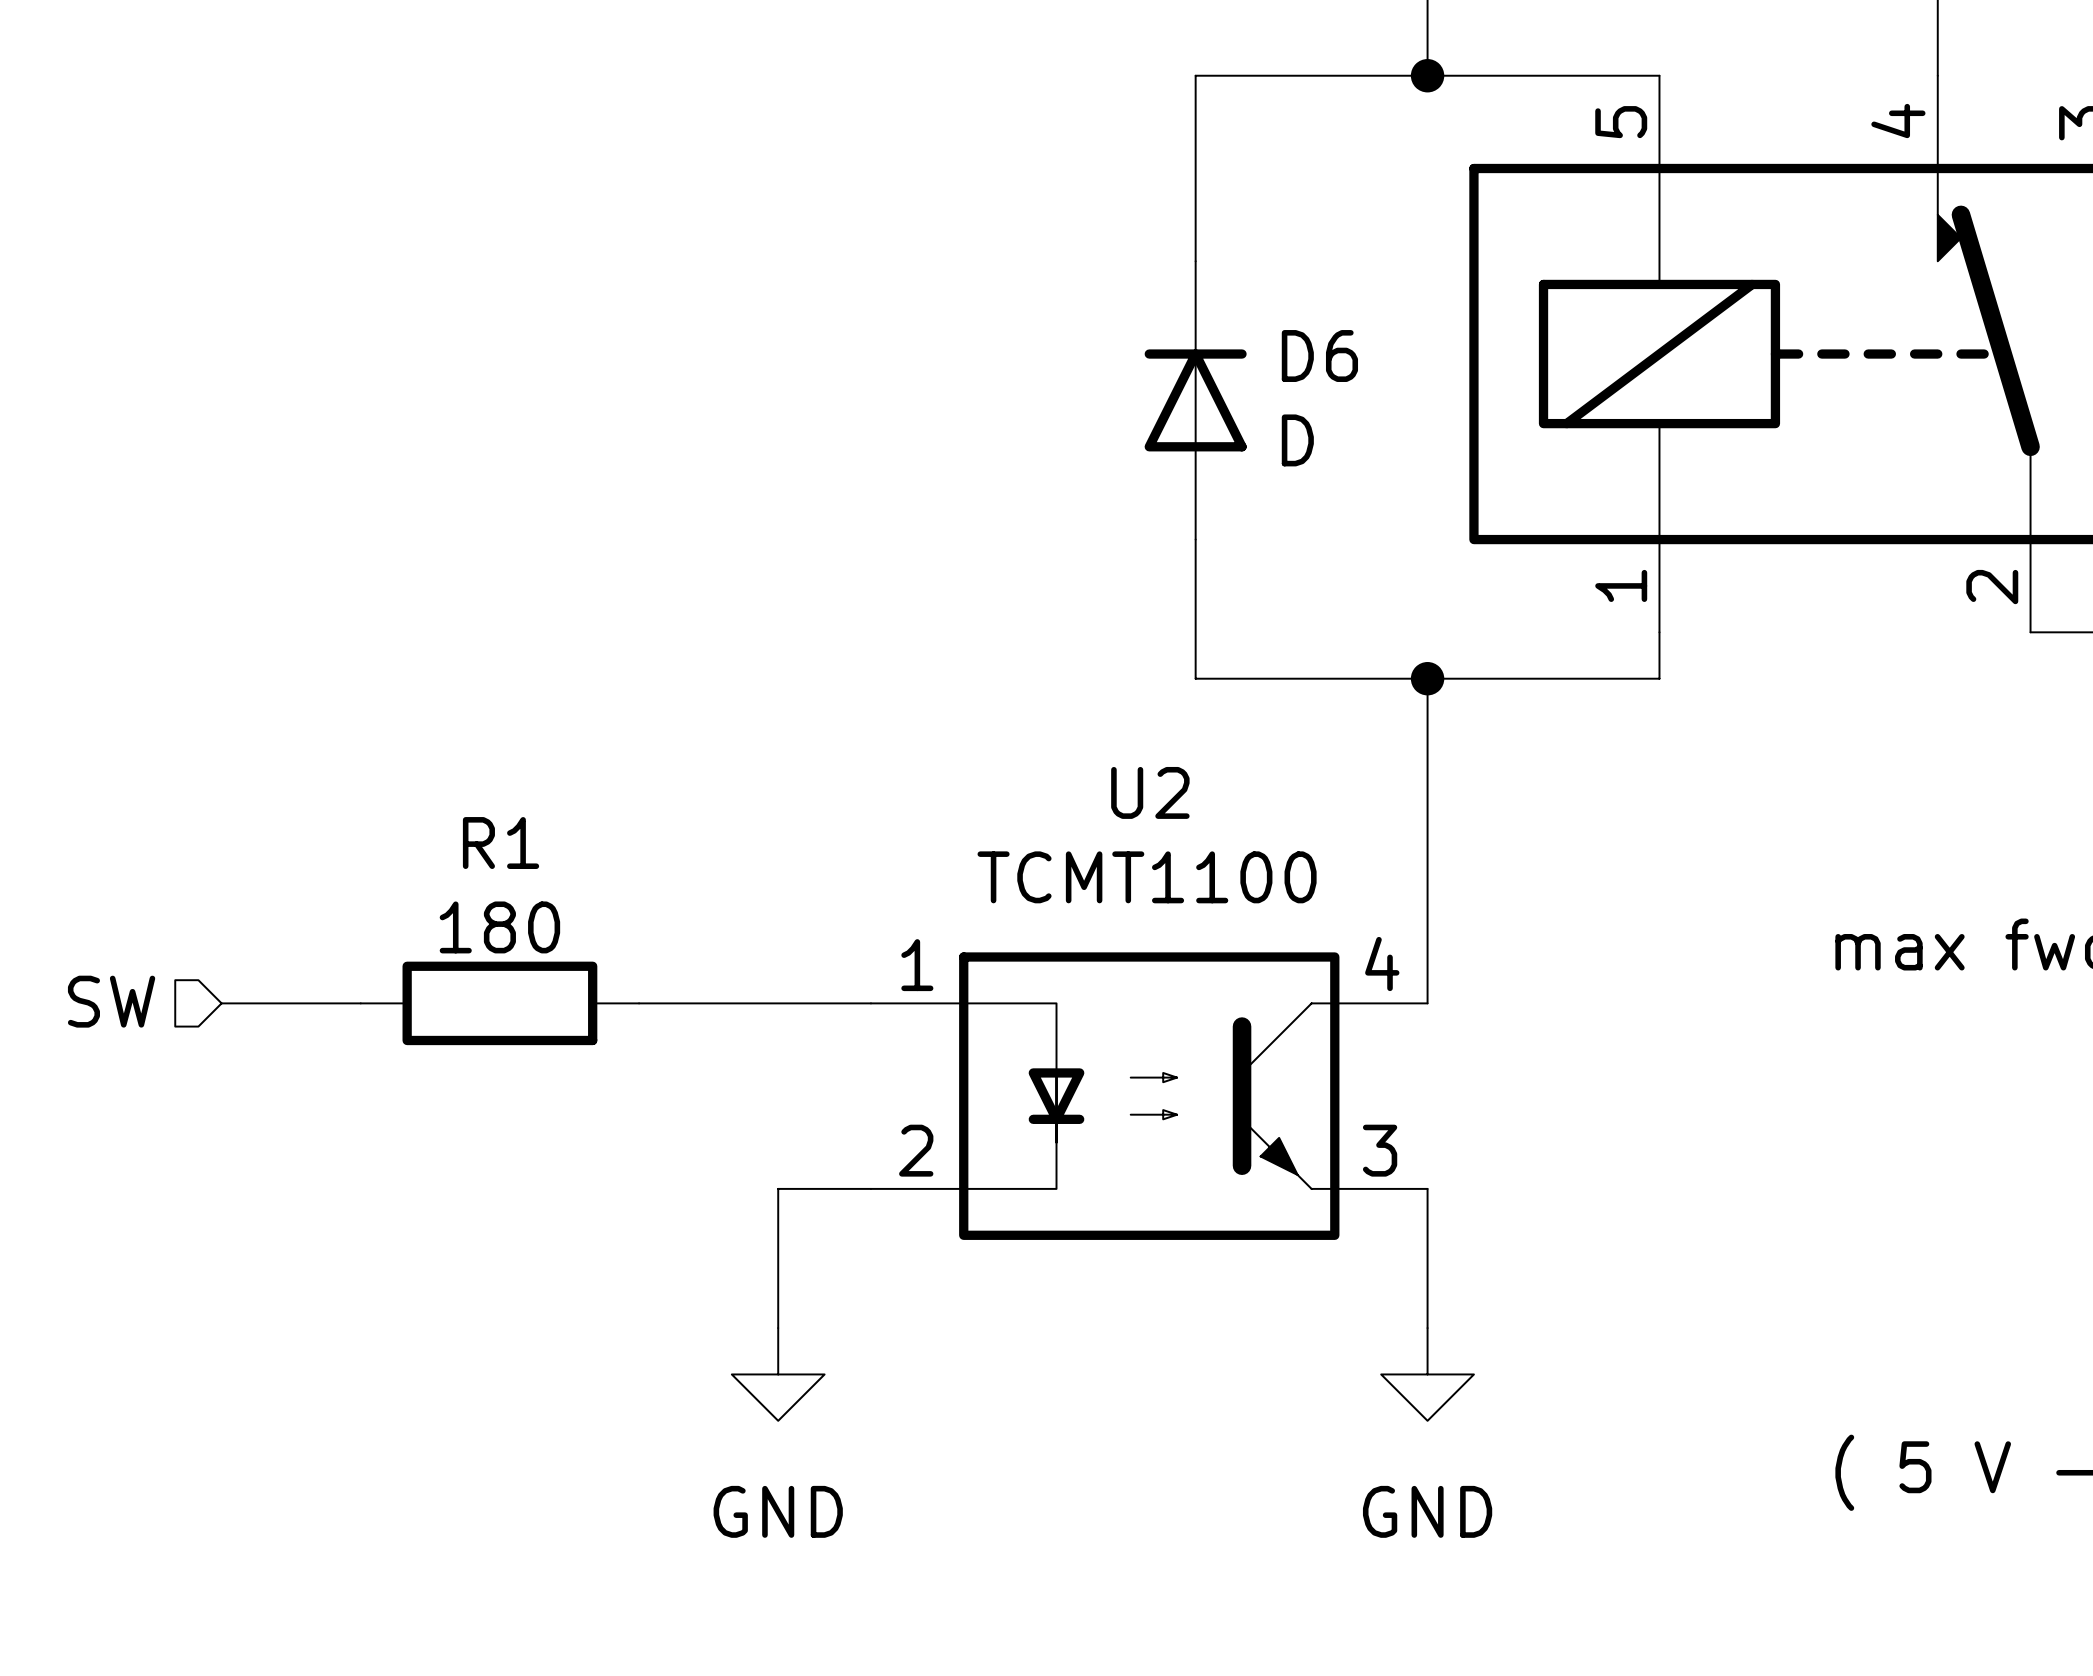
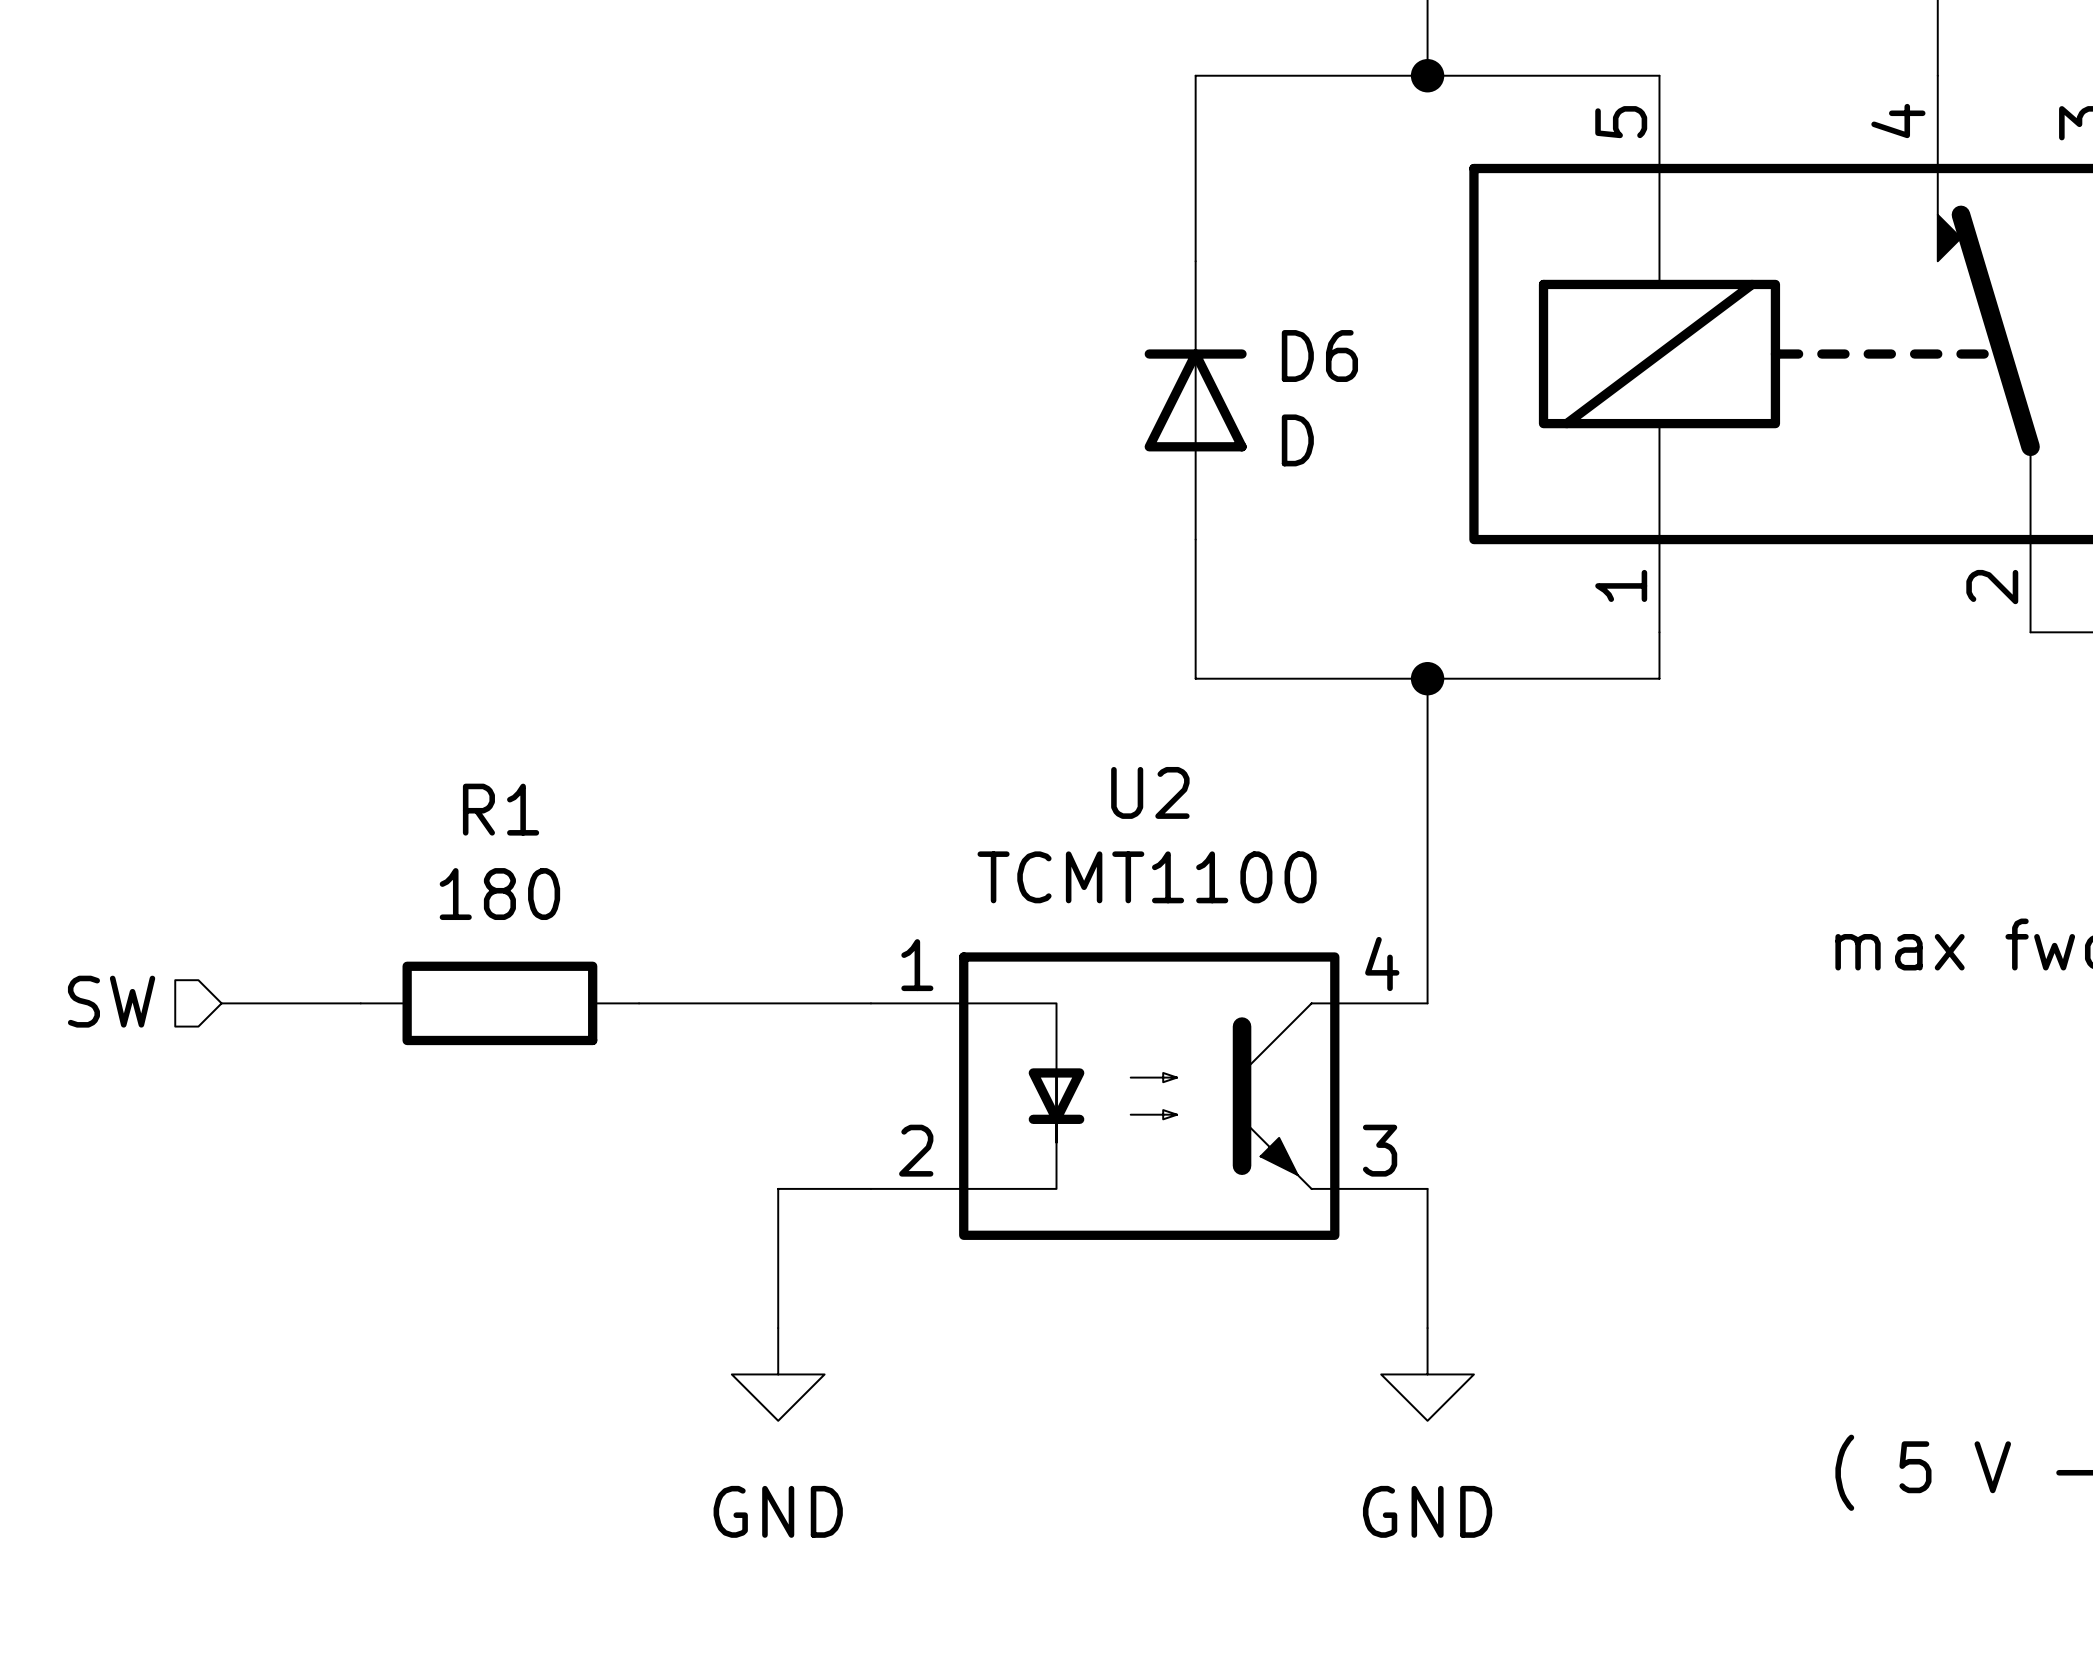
R1 name position: R1 (501, 843) -> R1 (501, 809)
R1 value position: 180 (499, 927) -> 180 (499, 894)

